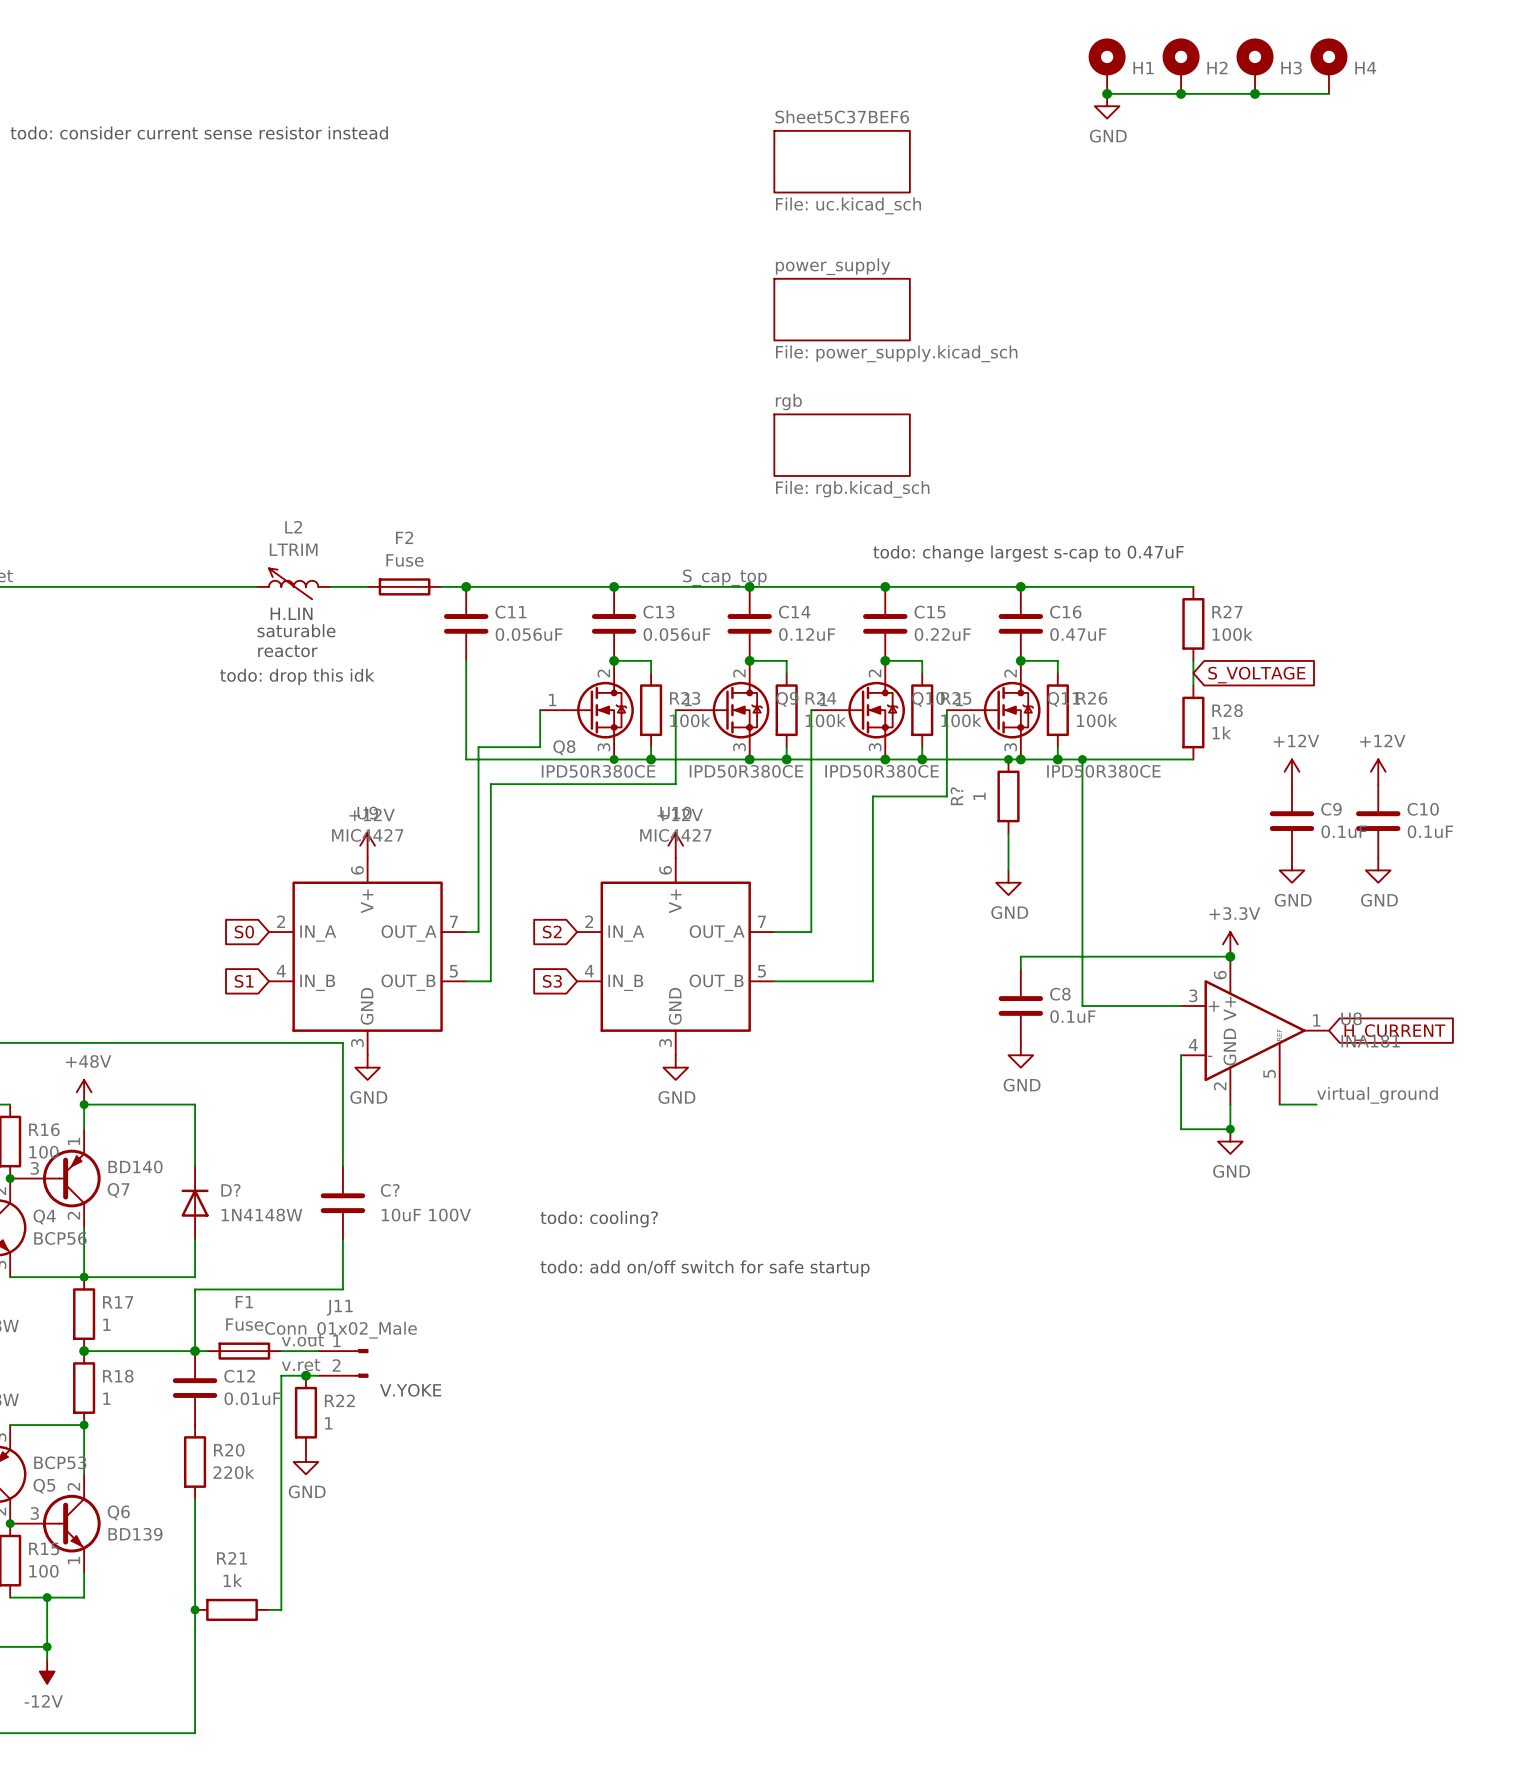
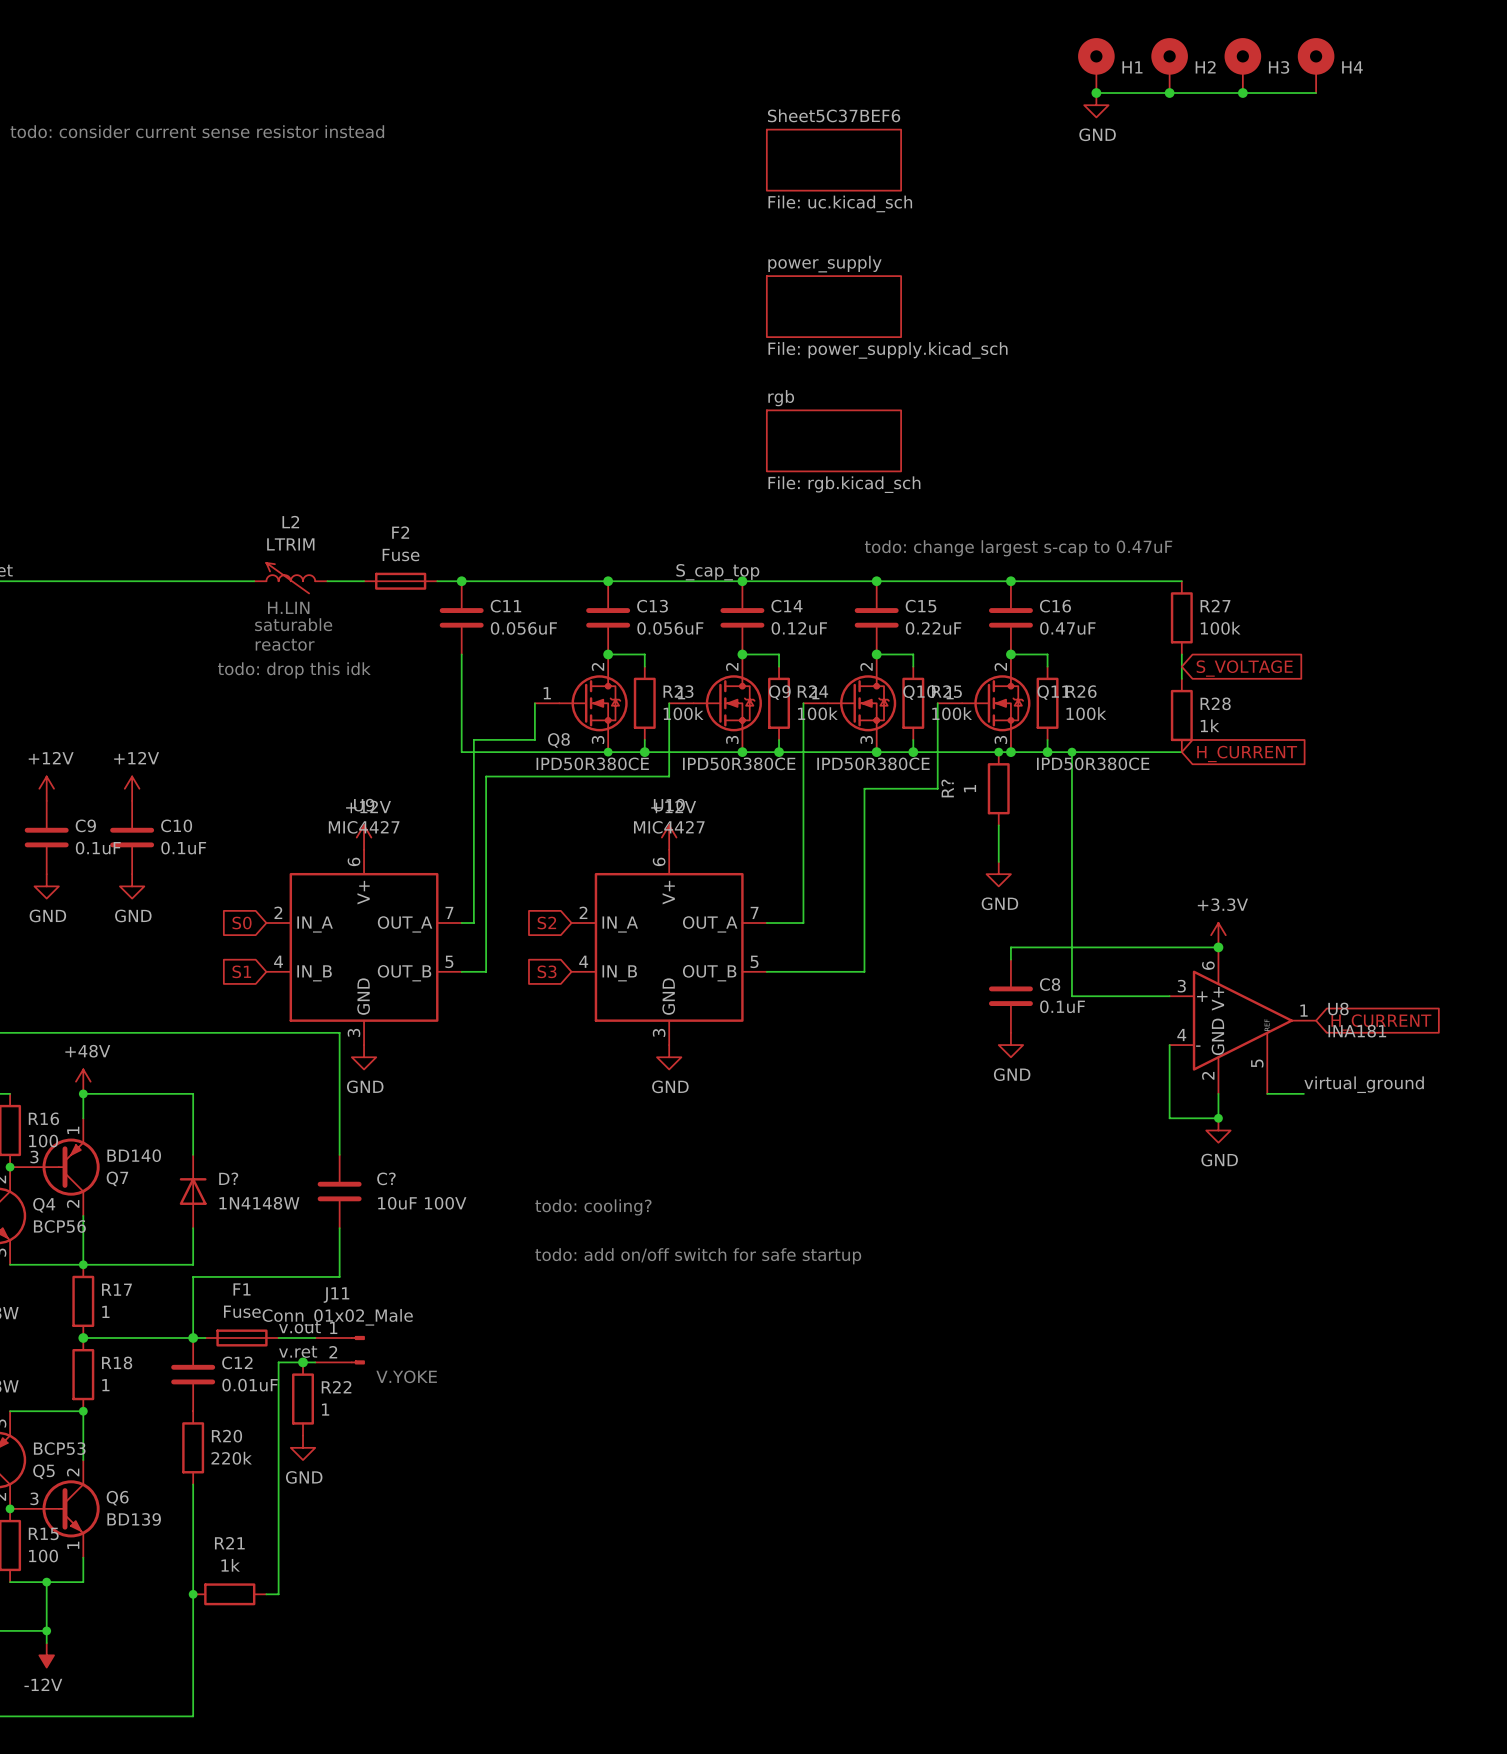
global label: none -> H_CURRENT (1247, 753)
power symbol: +12V (1292, 771) -> none
power symbol: +12V (1378, 771) -> none
power symbol: none -> +12V (46, 788)
power symbol: none -> +12V (132, 788)
C9 position: (1292, 821) -> (46, 837)
C10 position: (1378, 821) -> (132, 837)
power symbol: GND (1292, 870) -> none
power symbol: GND (1378, 870) -> none
power symbol: none -> GND (46, 886)
power symbol: none -> GND (132, 886)

